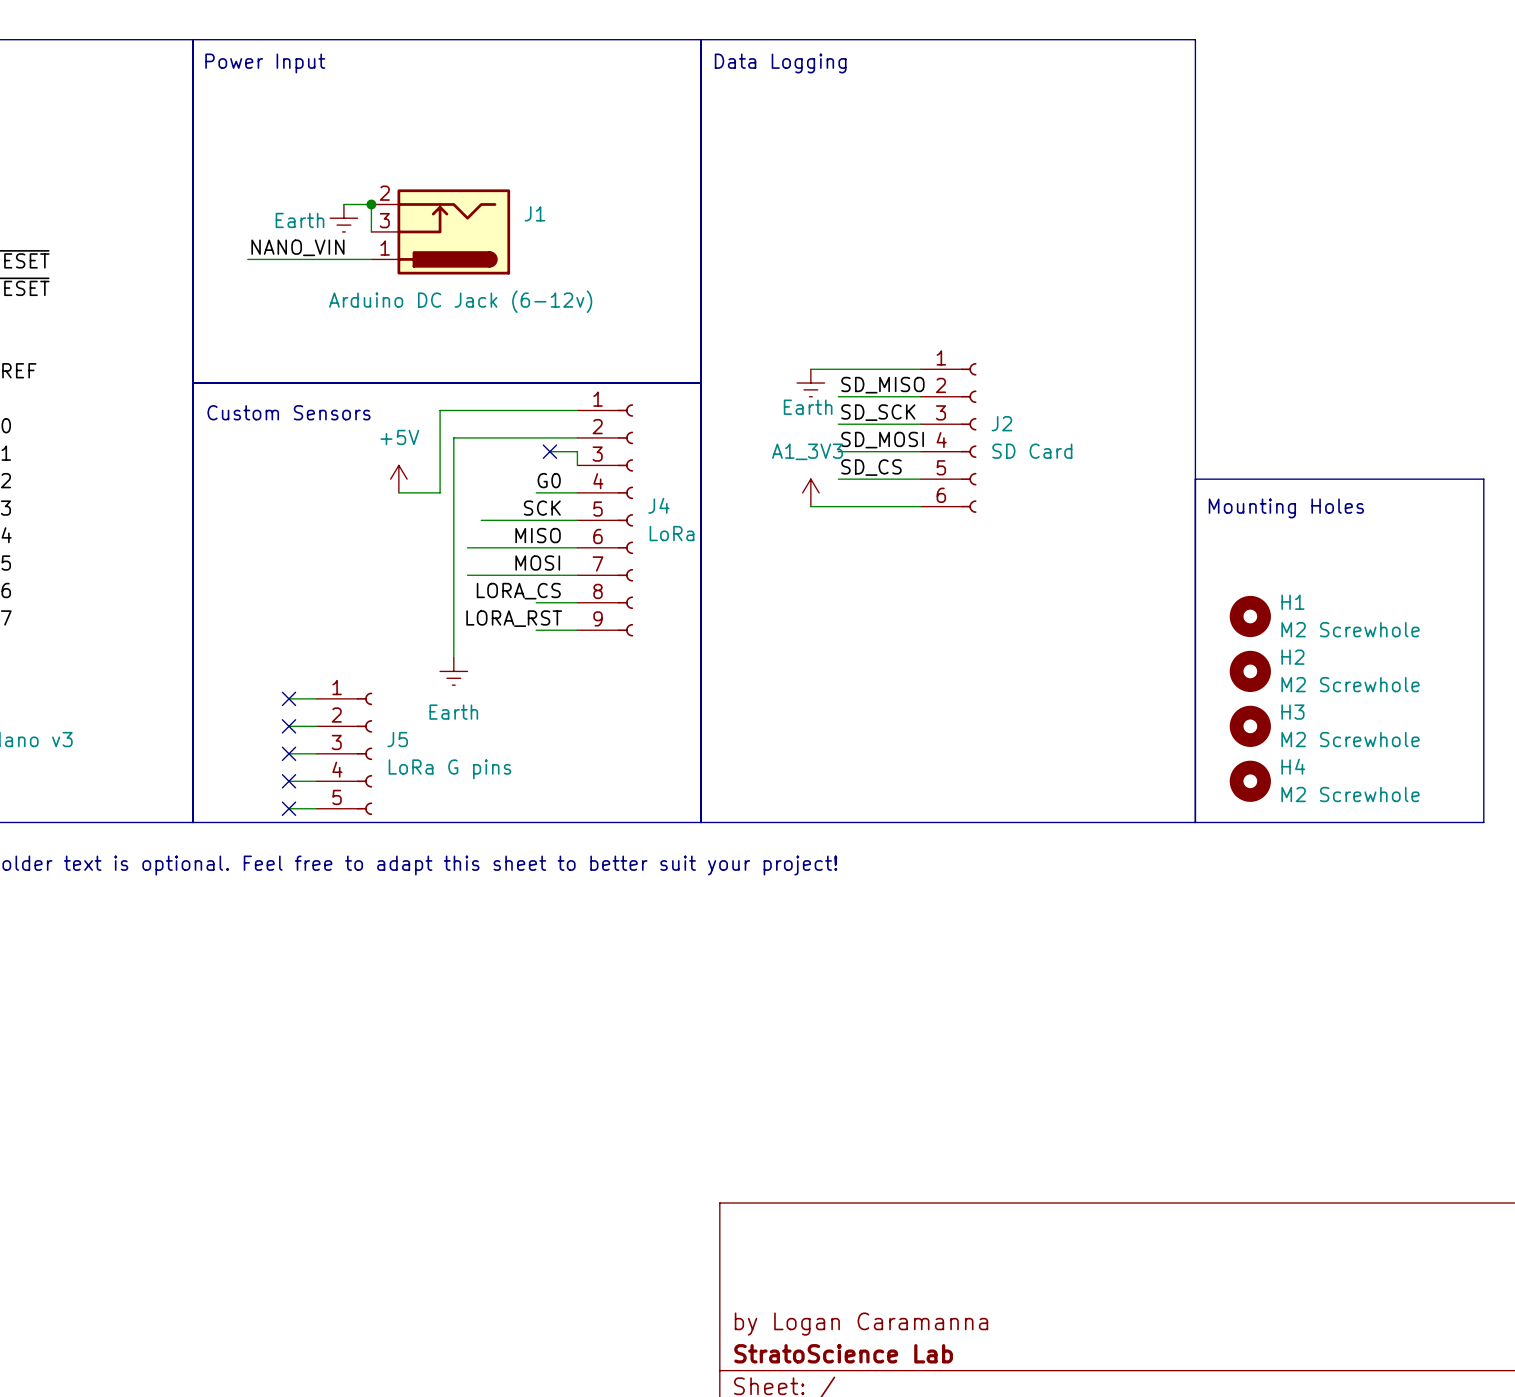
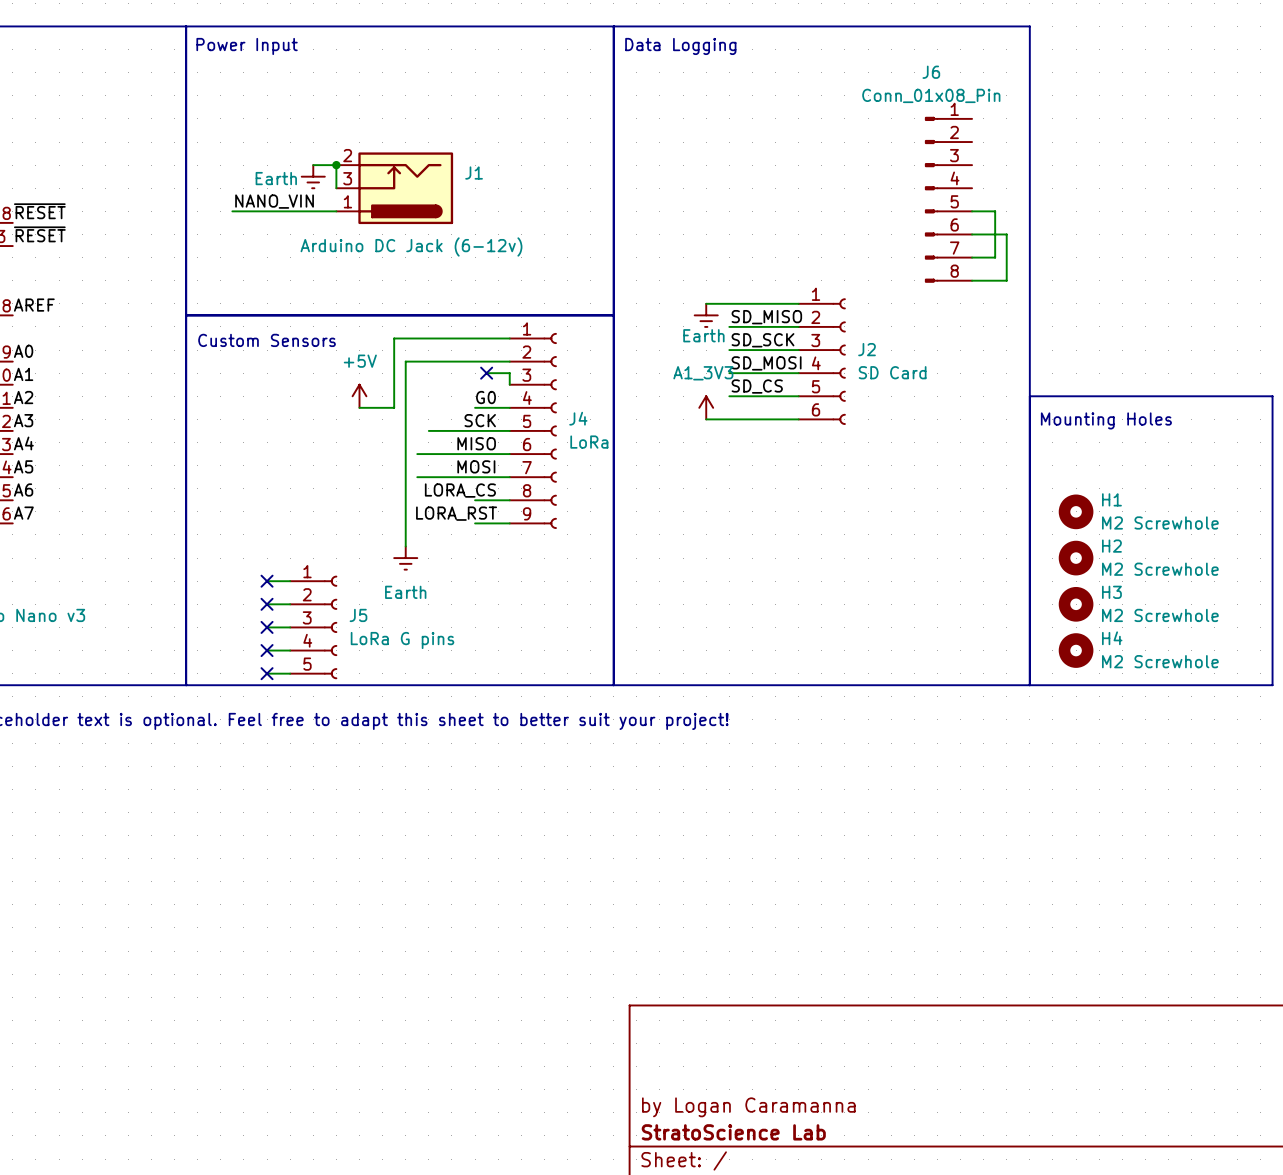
J6: none -> Conn_01x08_Pin (948, 199)
wire: none -> (972, 211) (995, 211) (995, 257) (972, 257)
wire: none -> (972, 234) (1006, 234) (1006, 280) (972, 280)

